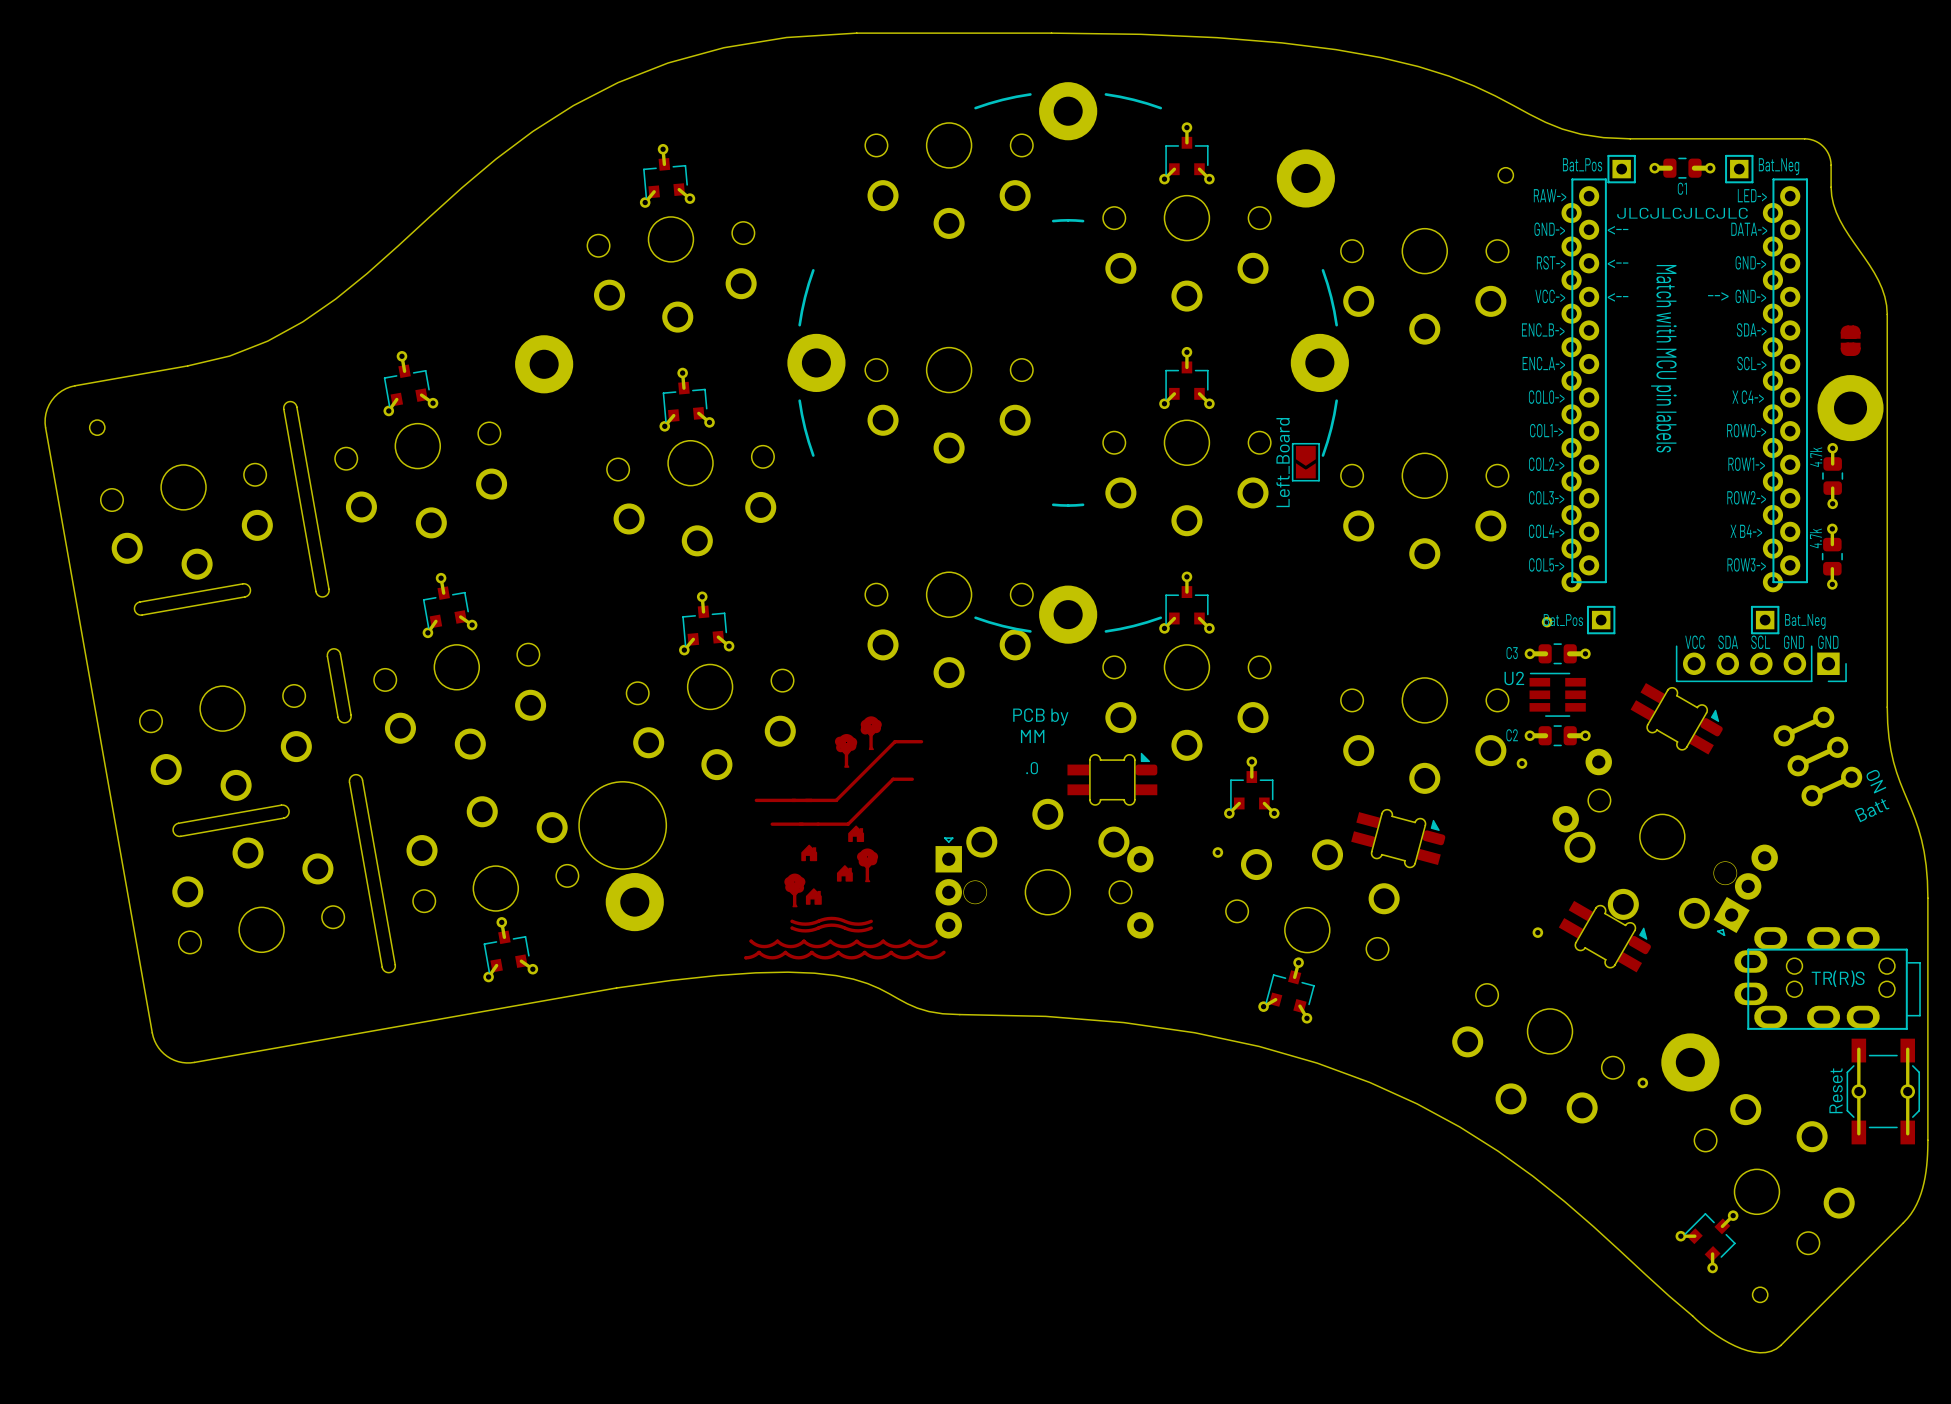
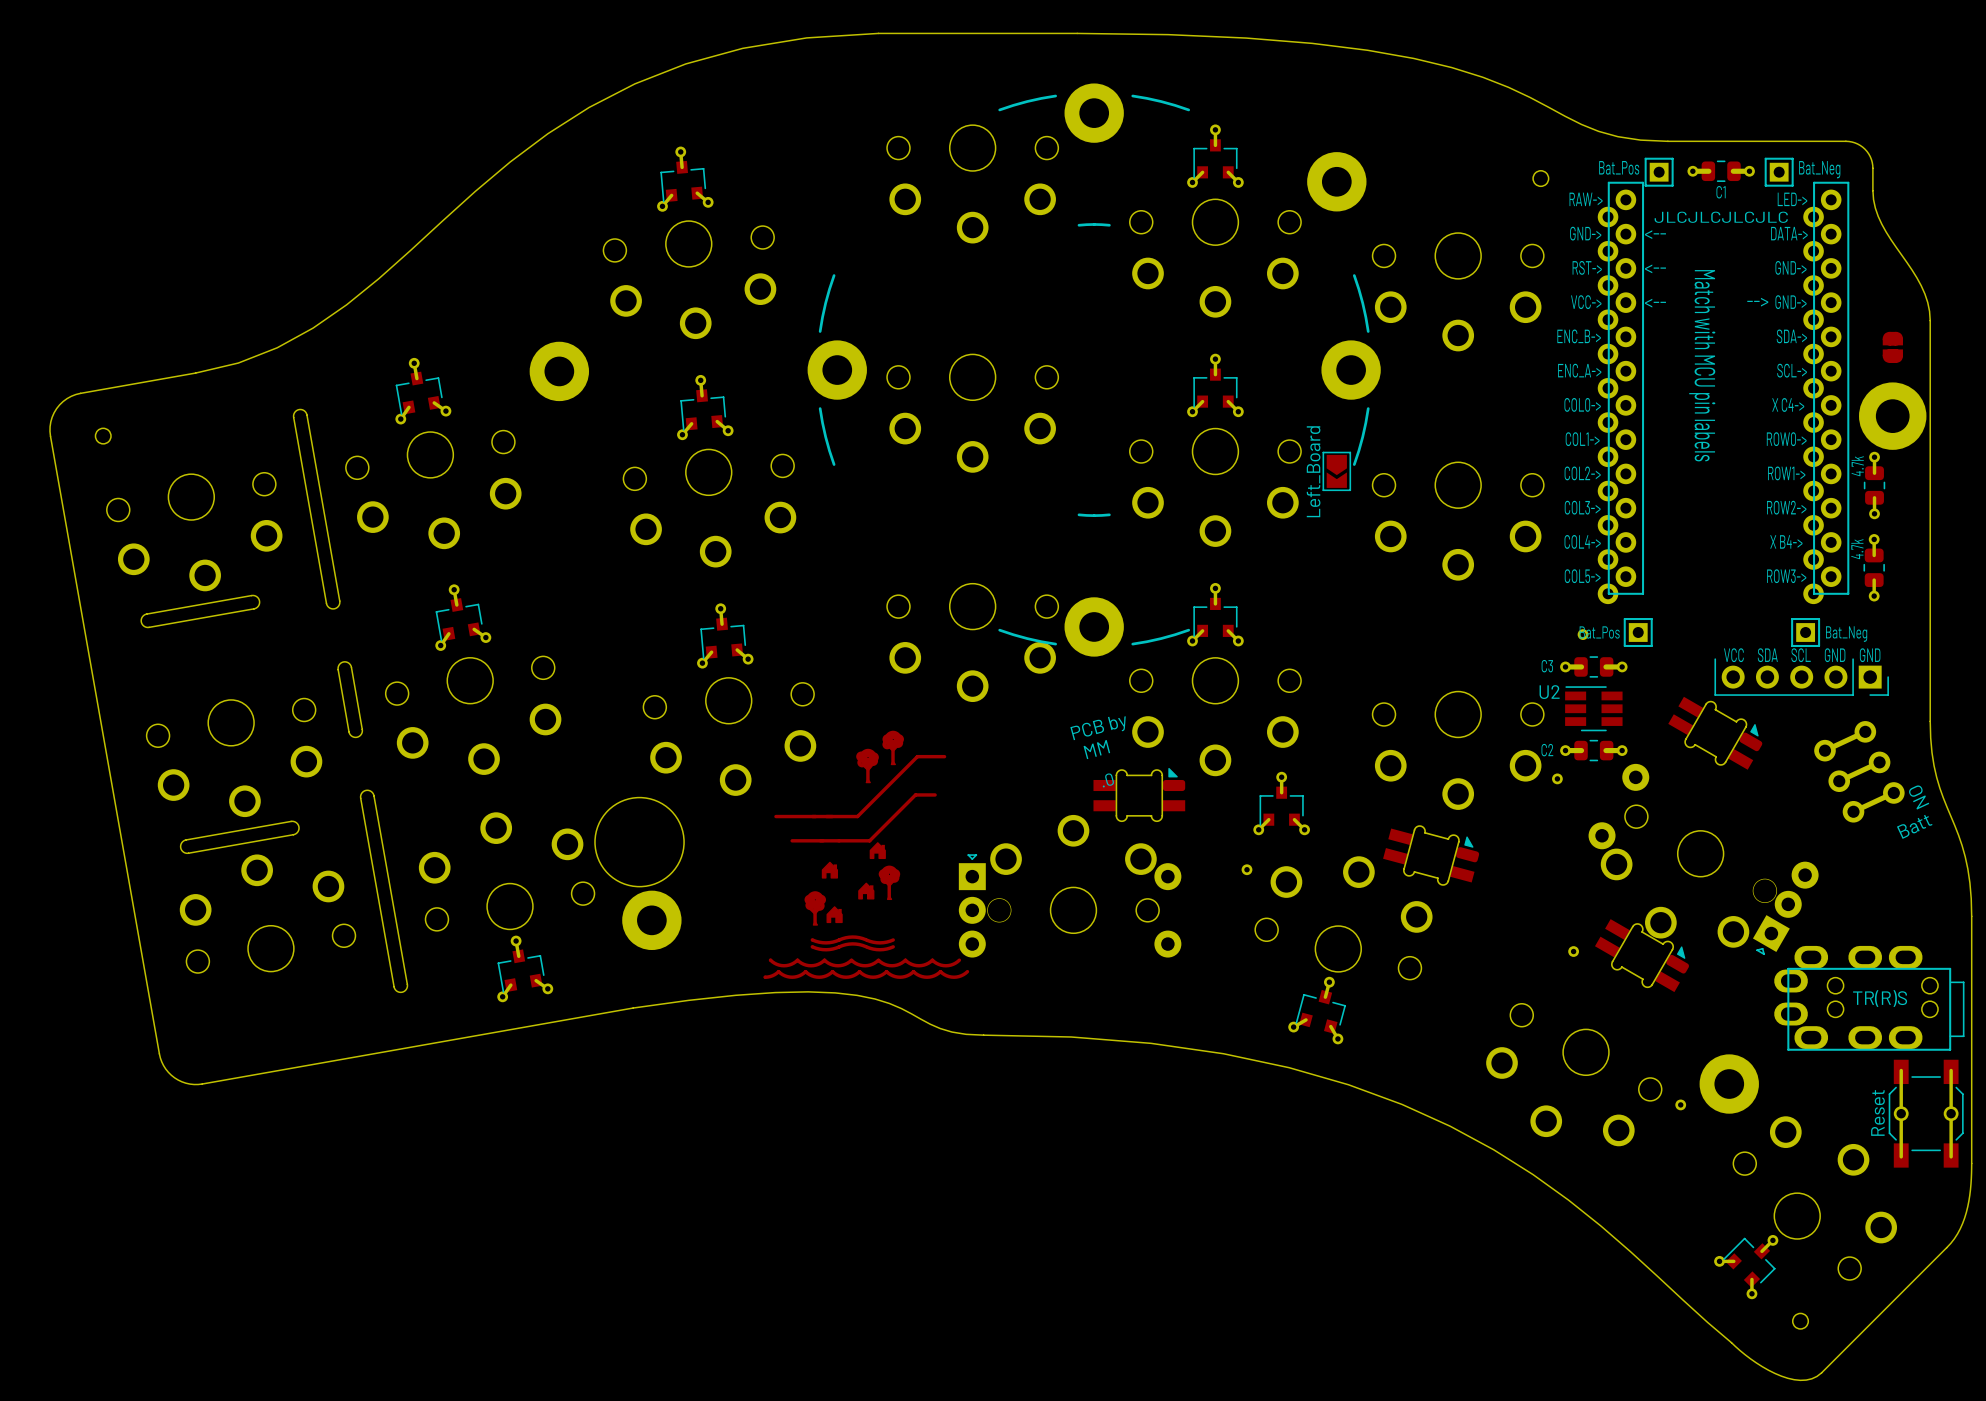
text rotation: 0° (1040, 716) -> 15° counterclockwise (1098, 728)
text rotation: 0° (1032, 736) -> 15° counterclockwise (1096, 749)
text rotation: 0° (1032, 768) -> 15° counterclockwise (1108, 780)
text position: .0 (1032, 768) -> .0 (1108, 780)

